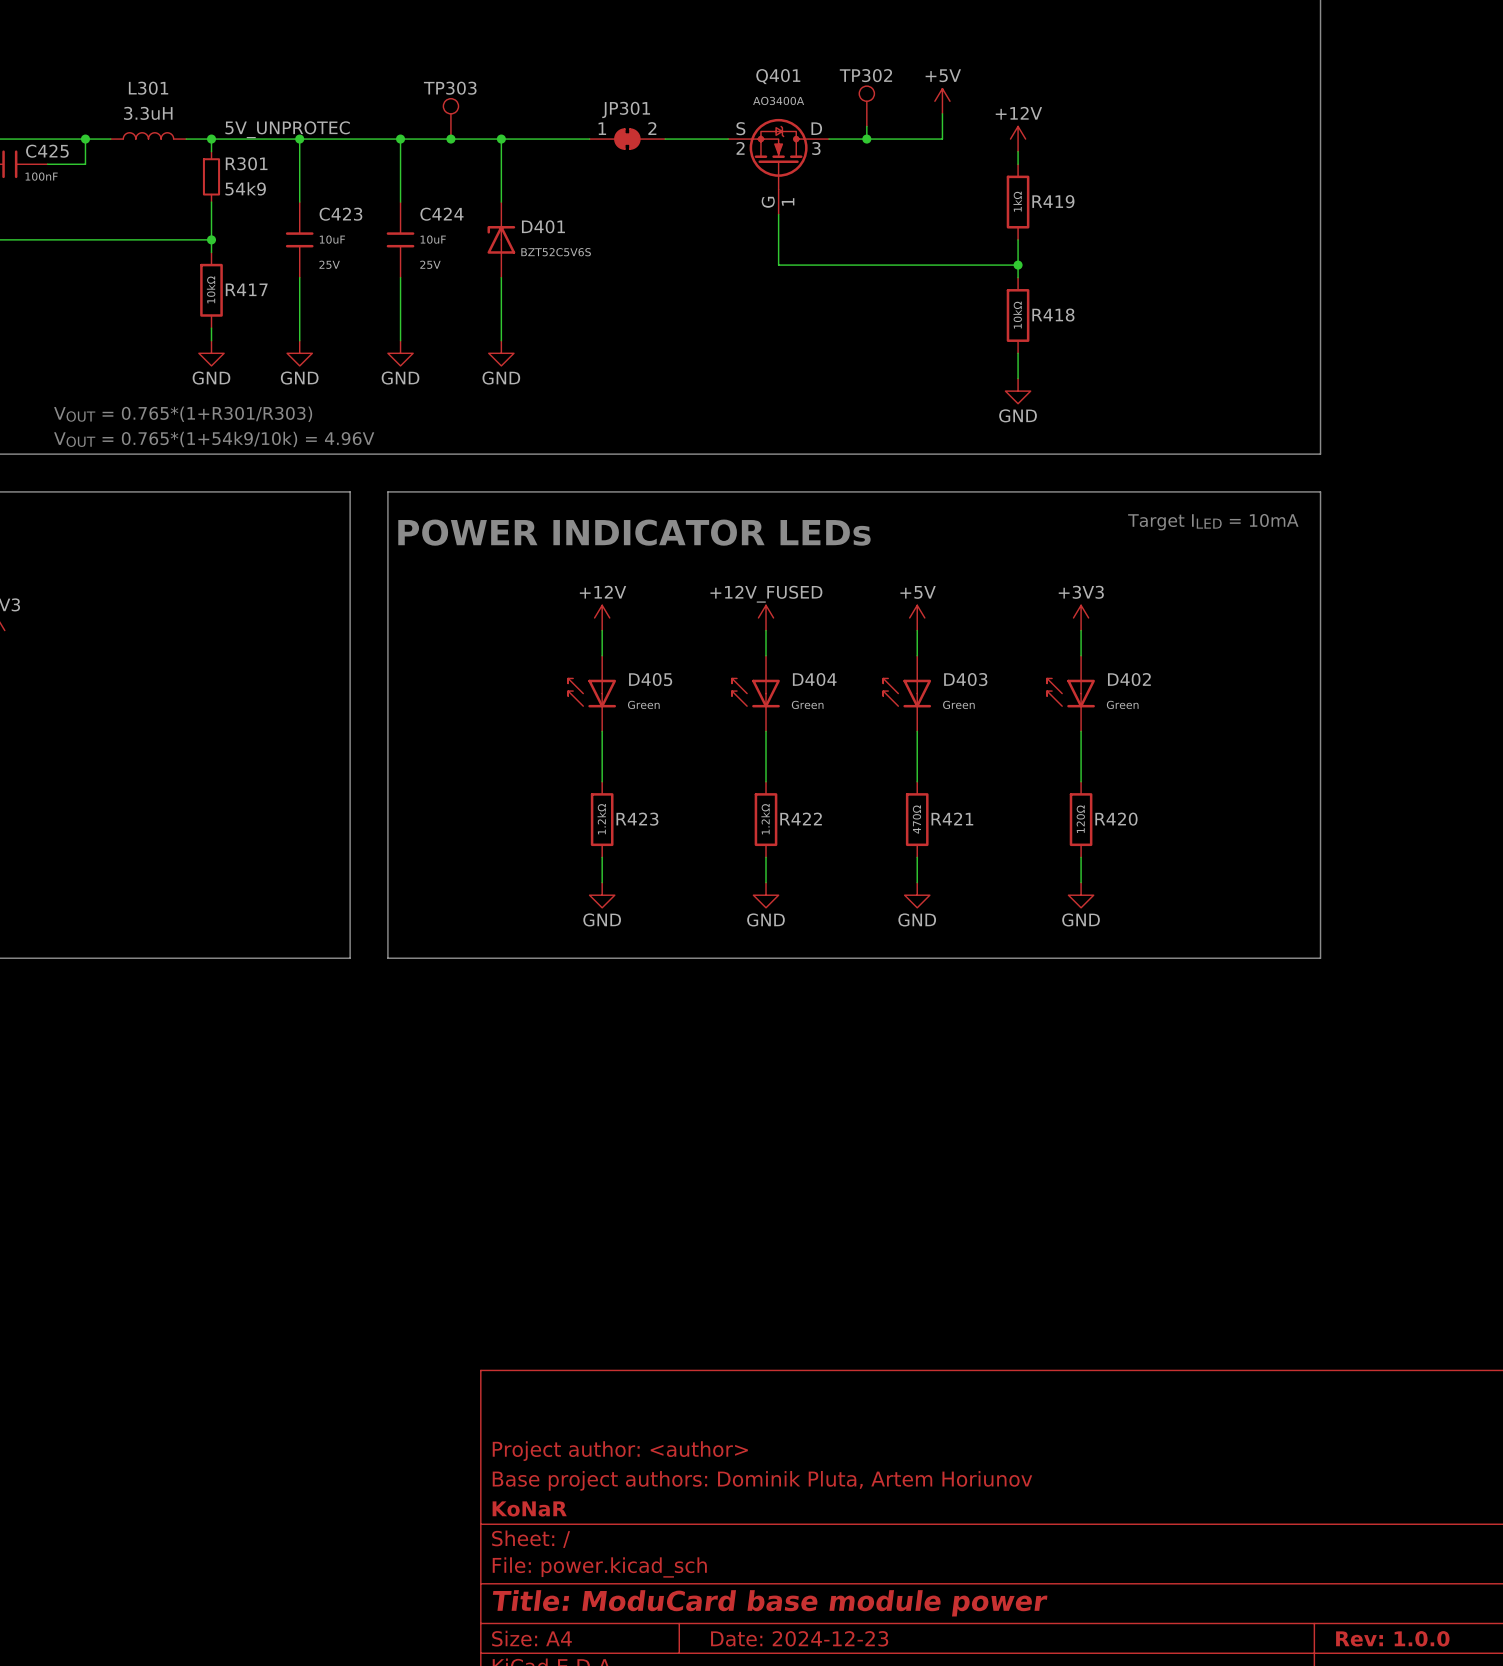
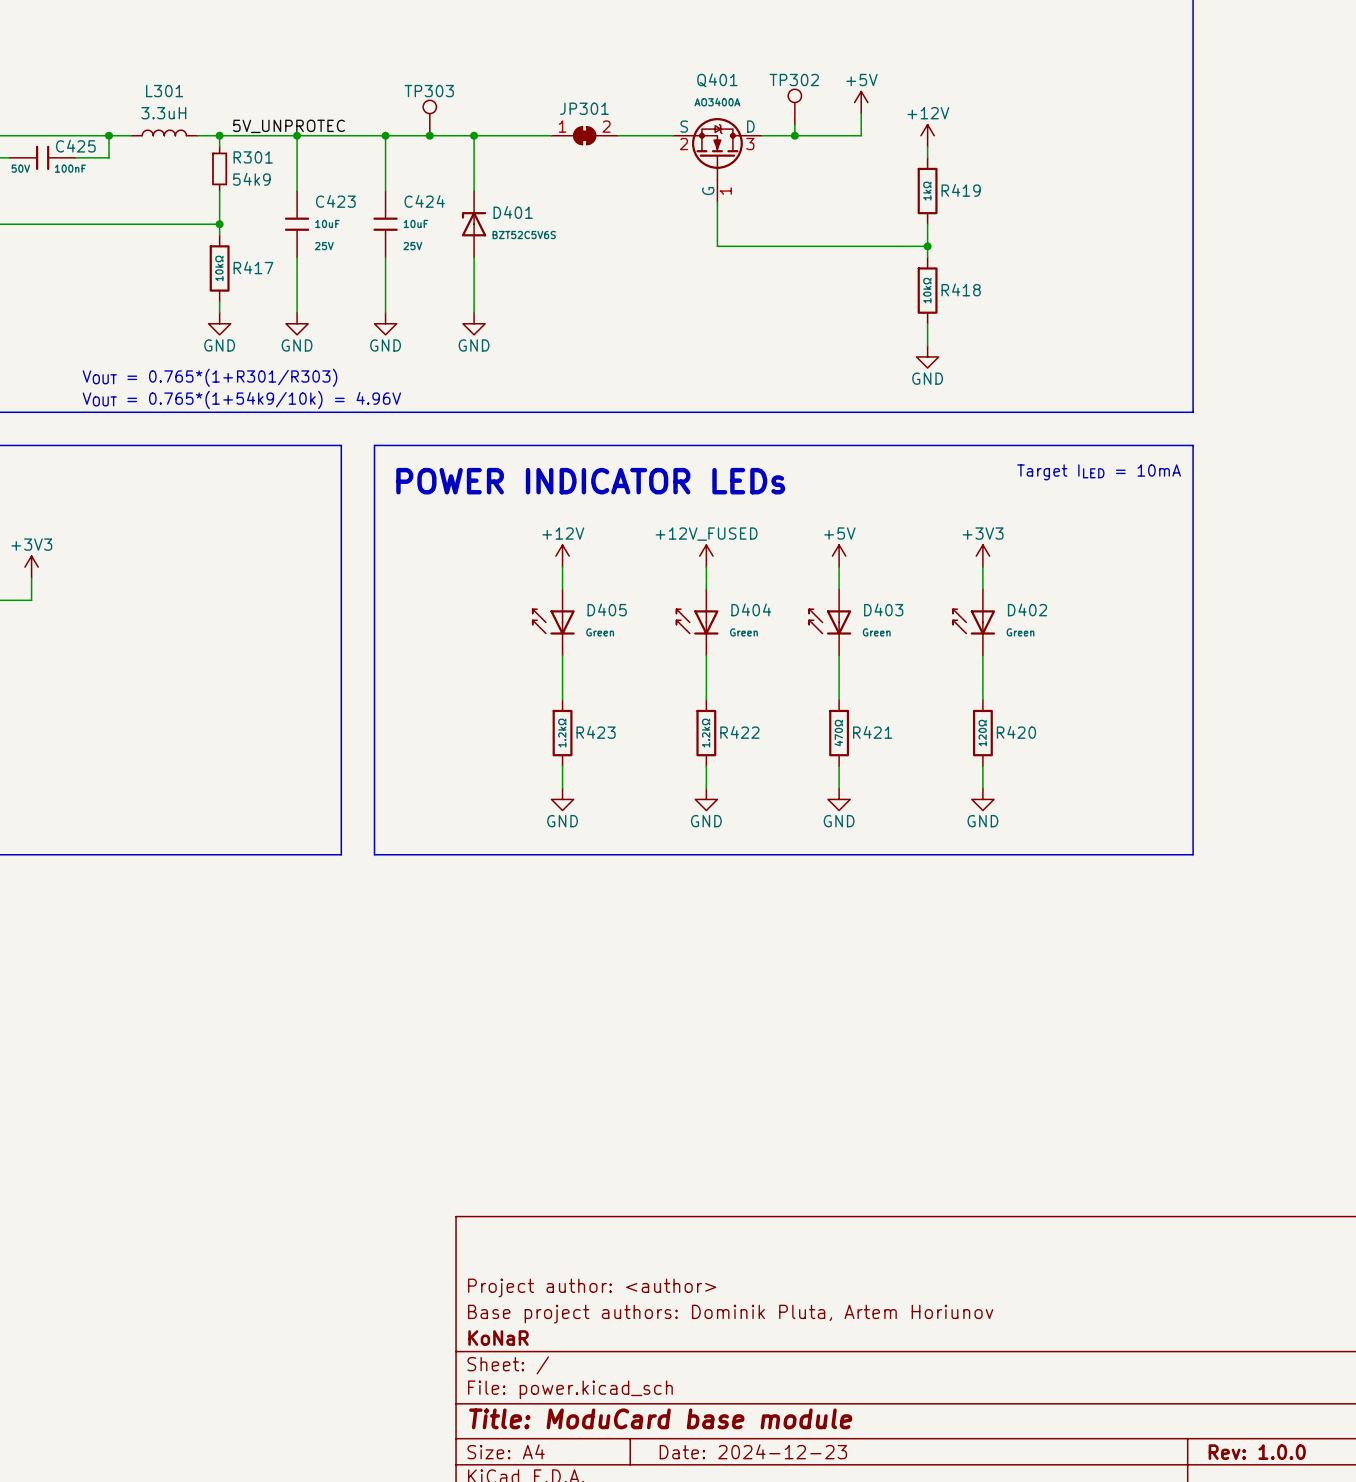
title block: Title: ModuCard base module power (770, 1603) -> Title: ModuCard base module (660, 1418)

